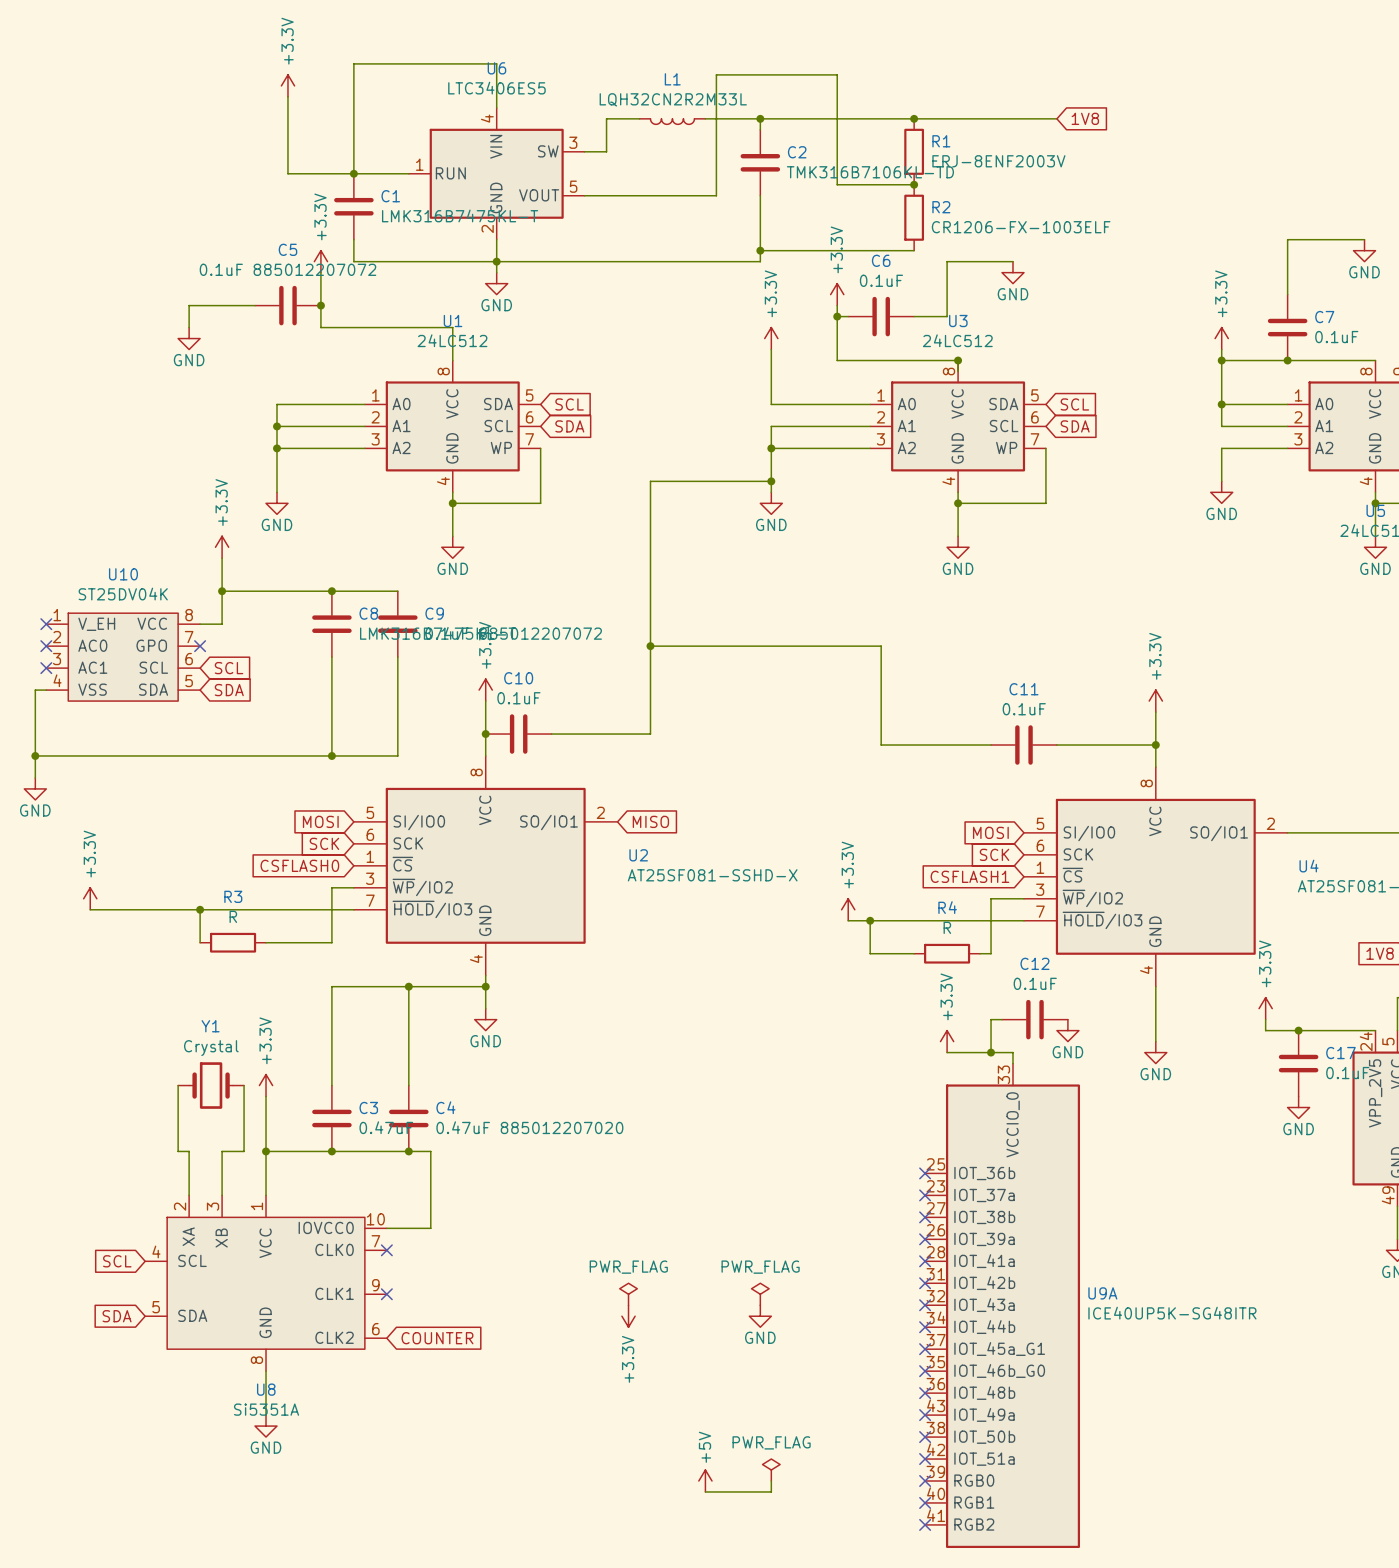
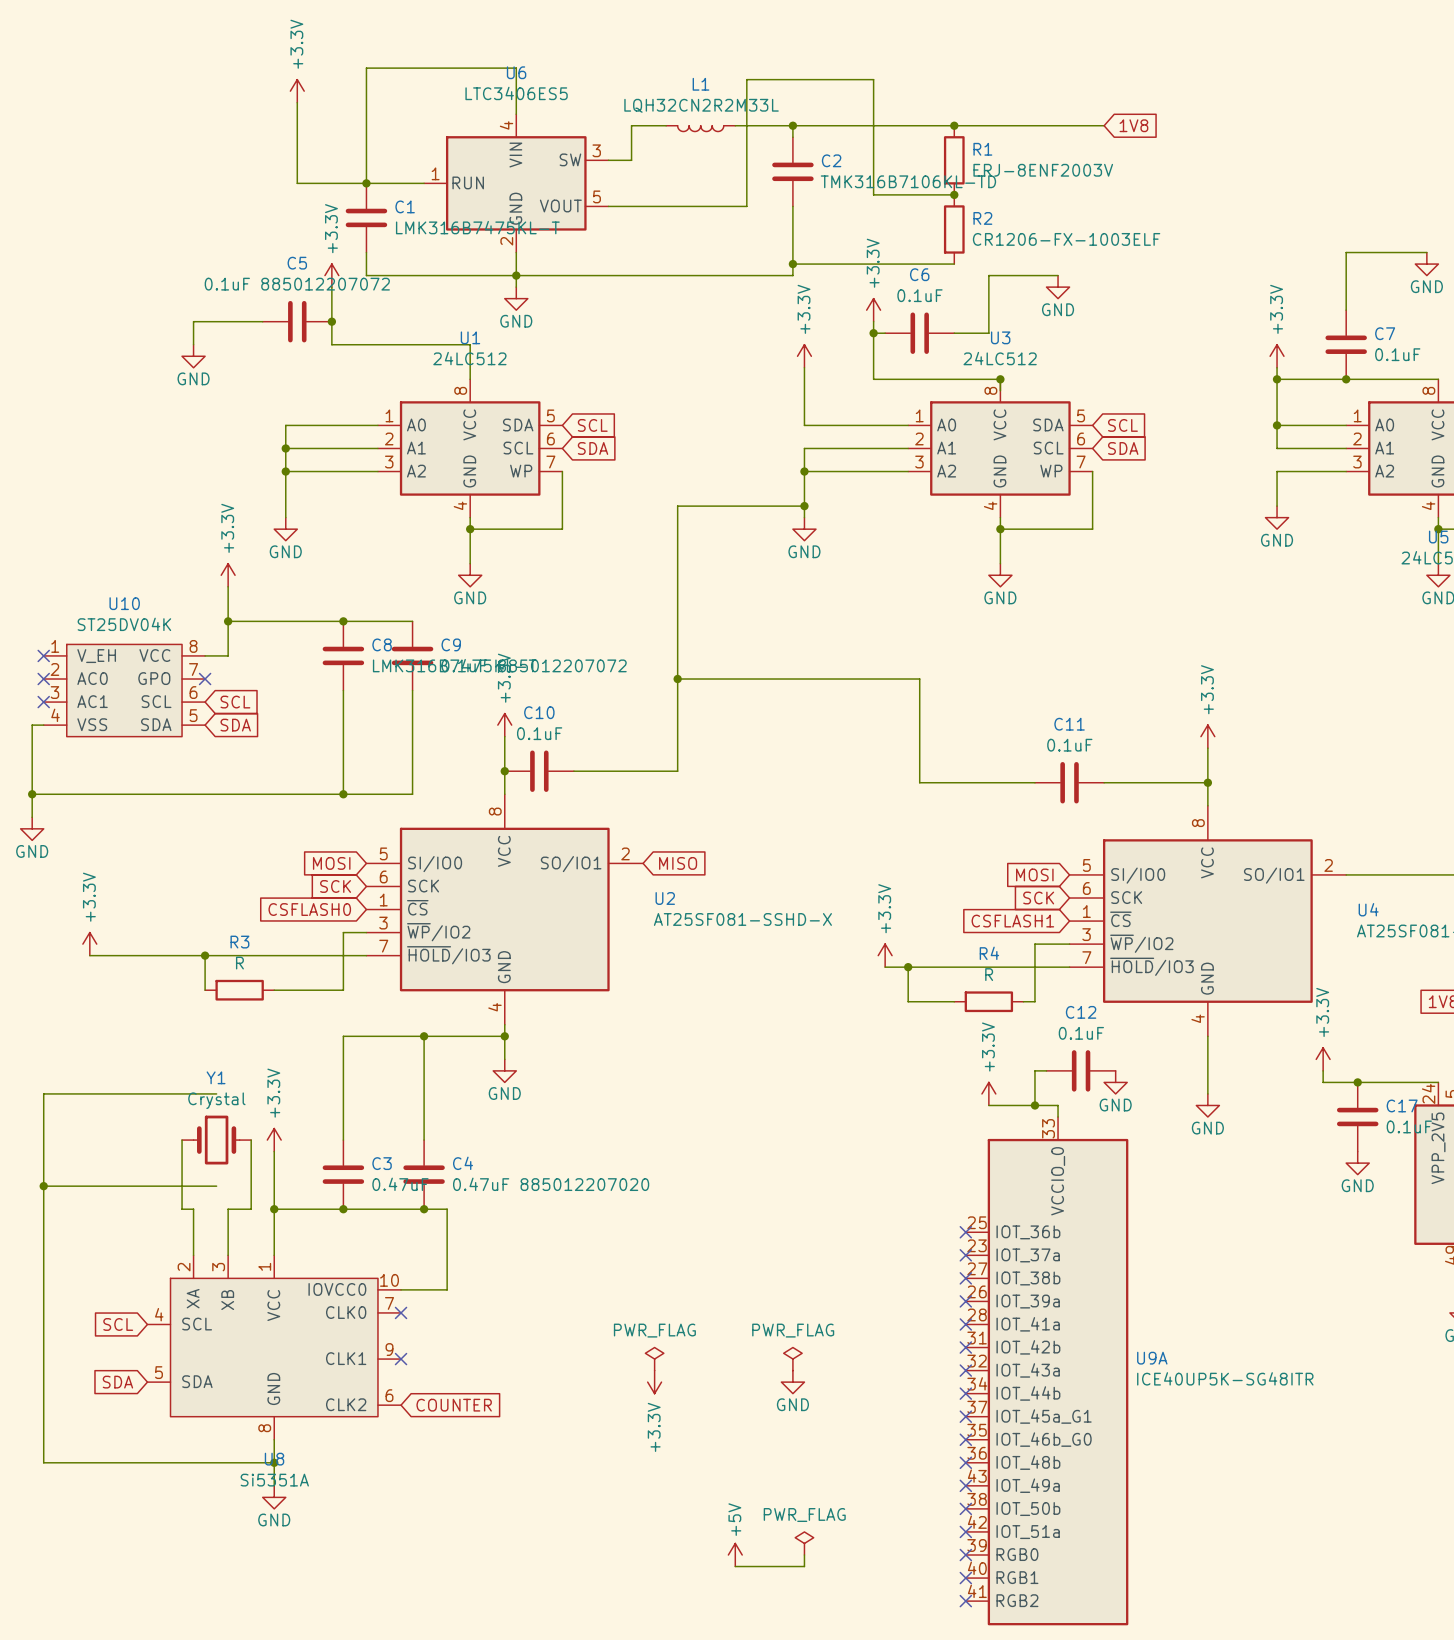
wire: none -> (216, 1093) (43, 1093) (43, 1462) (274, 1462)
wire: none -> (43, 1186) (216, 1186)
junction: none -> (43, 1186)
junction: none -> (274, 1462)

